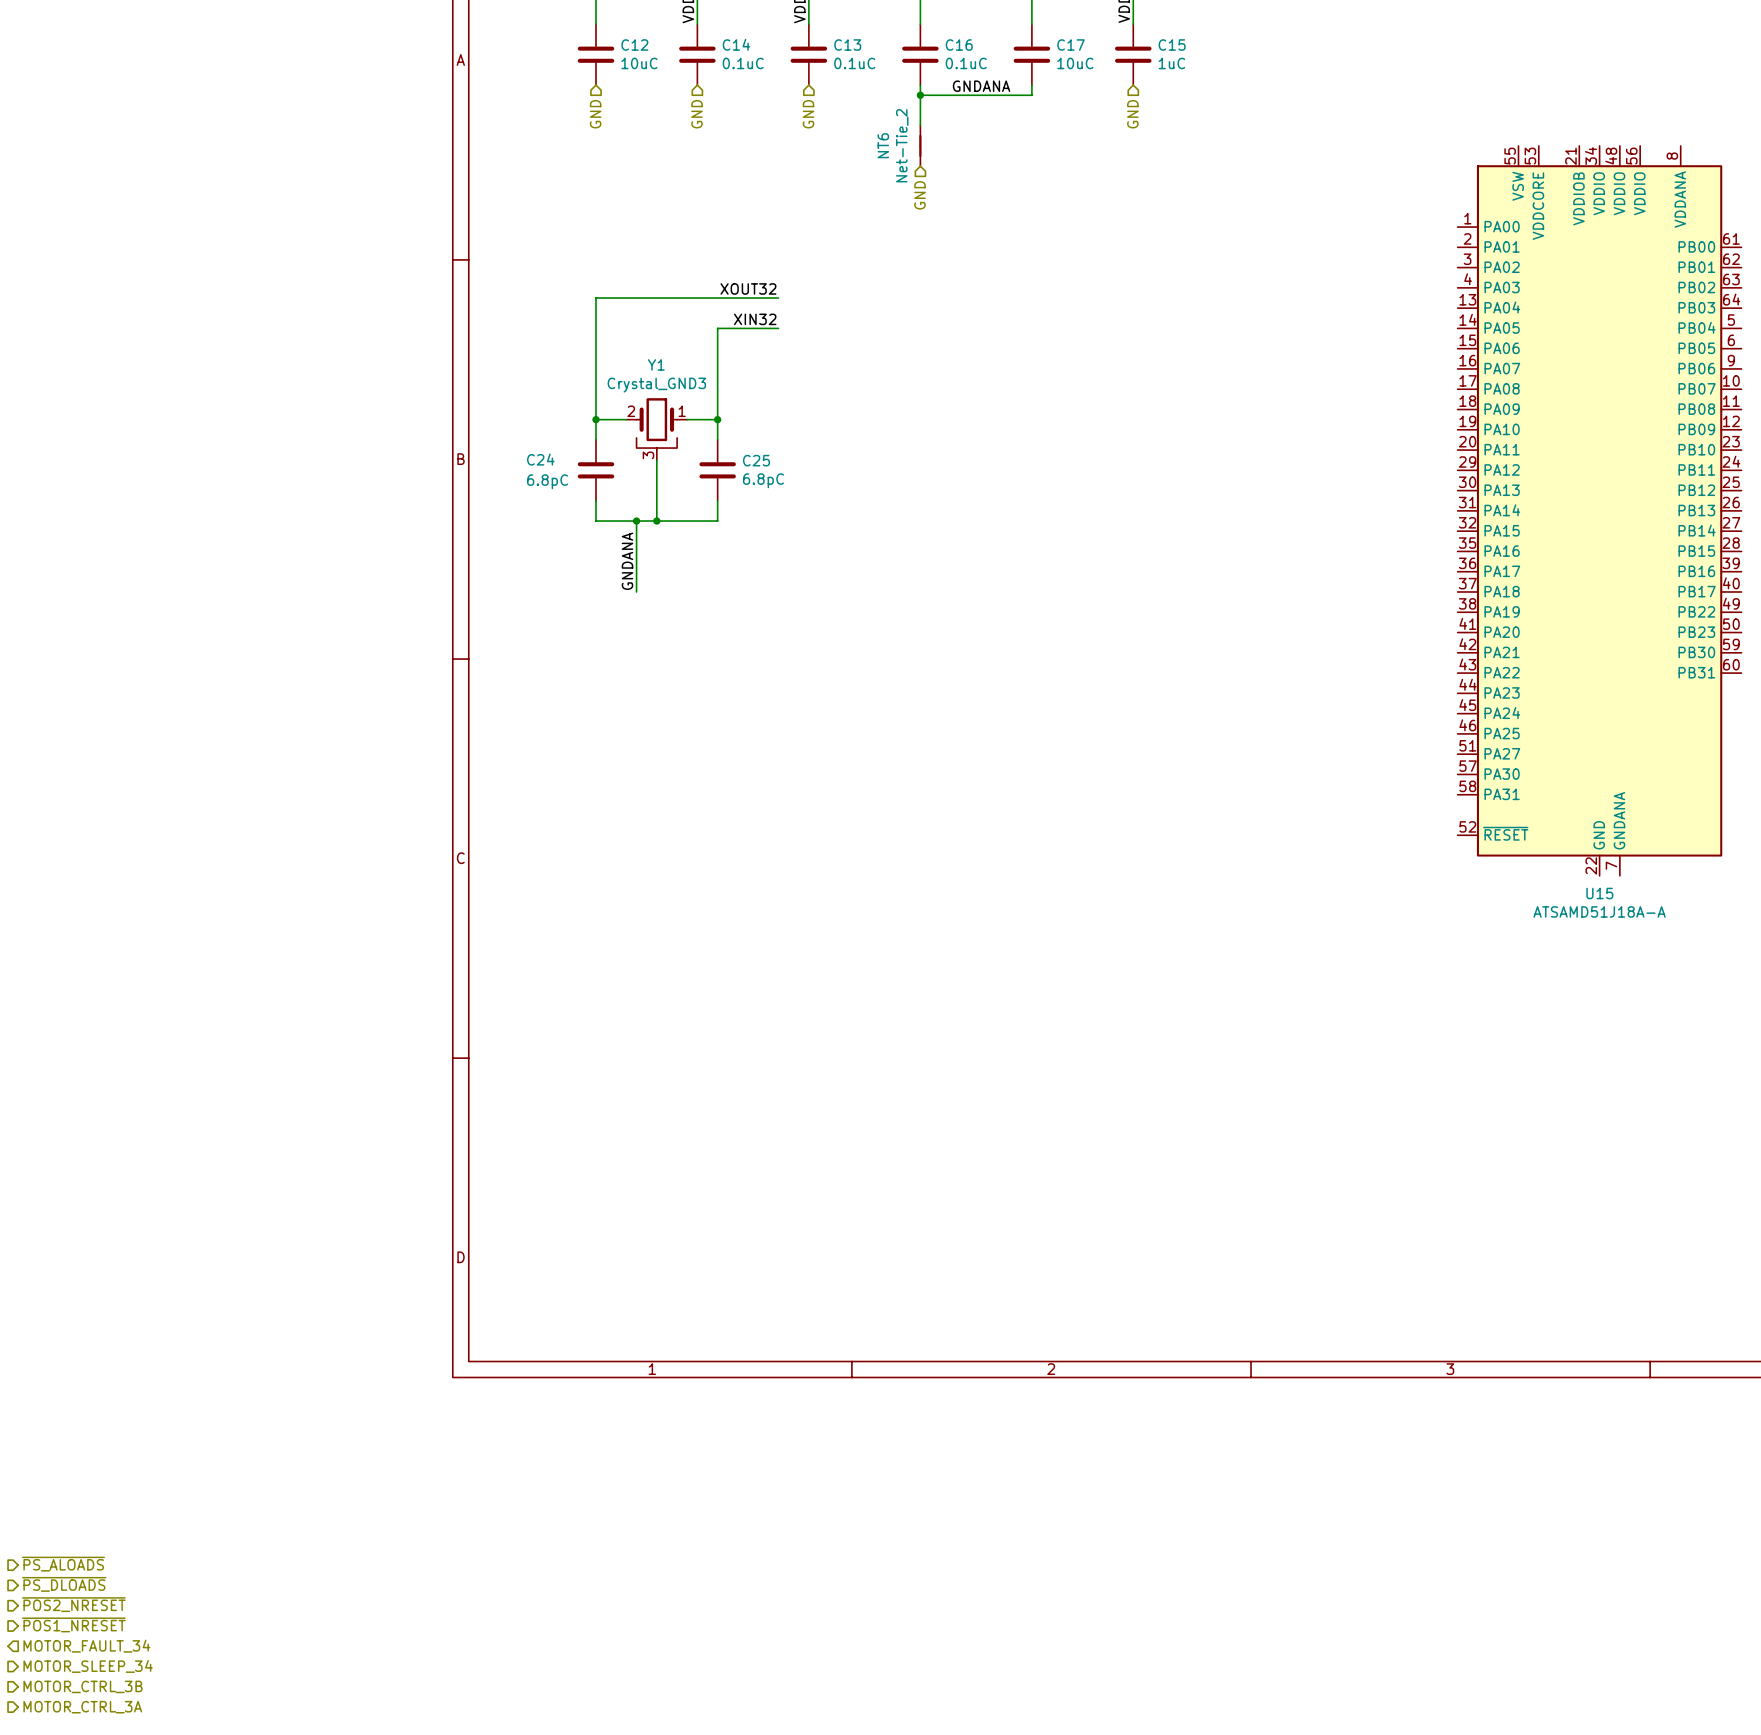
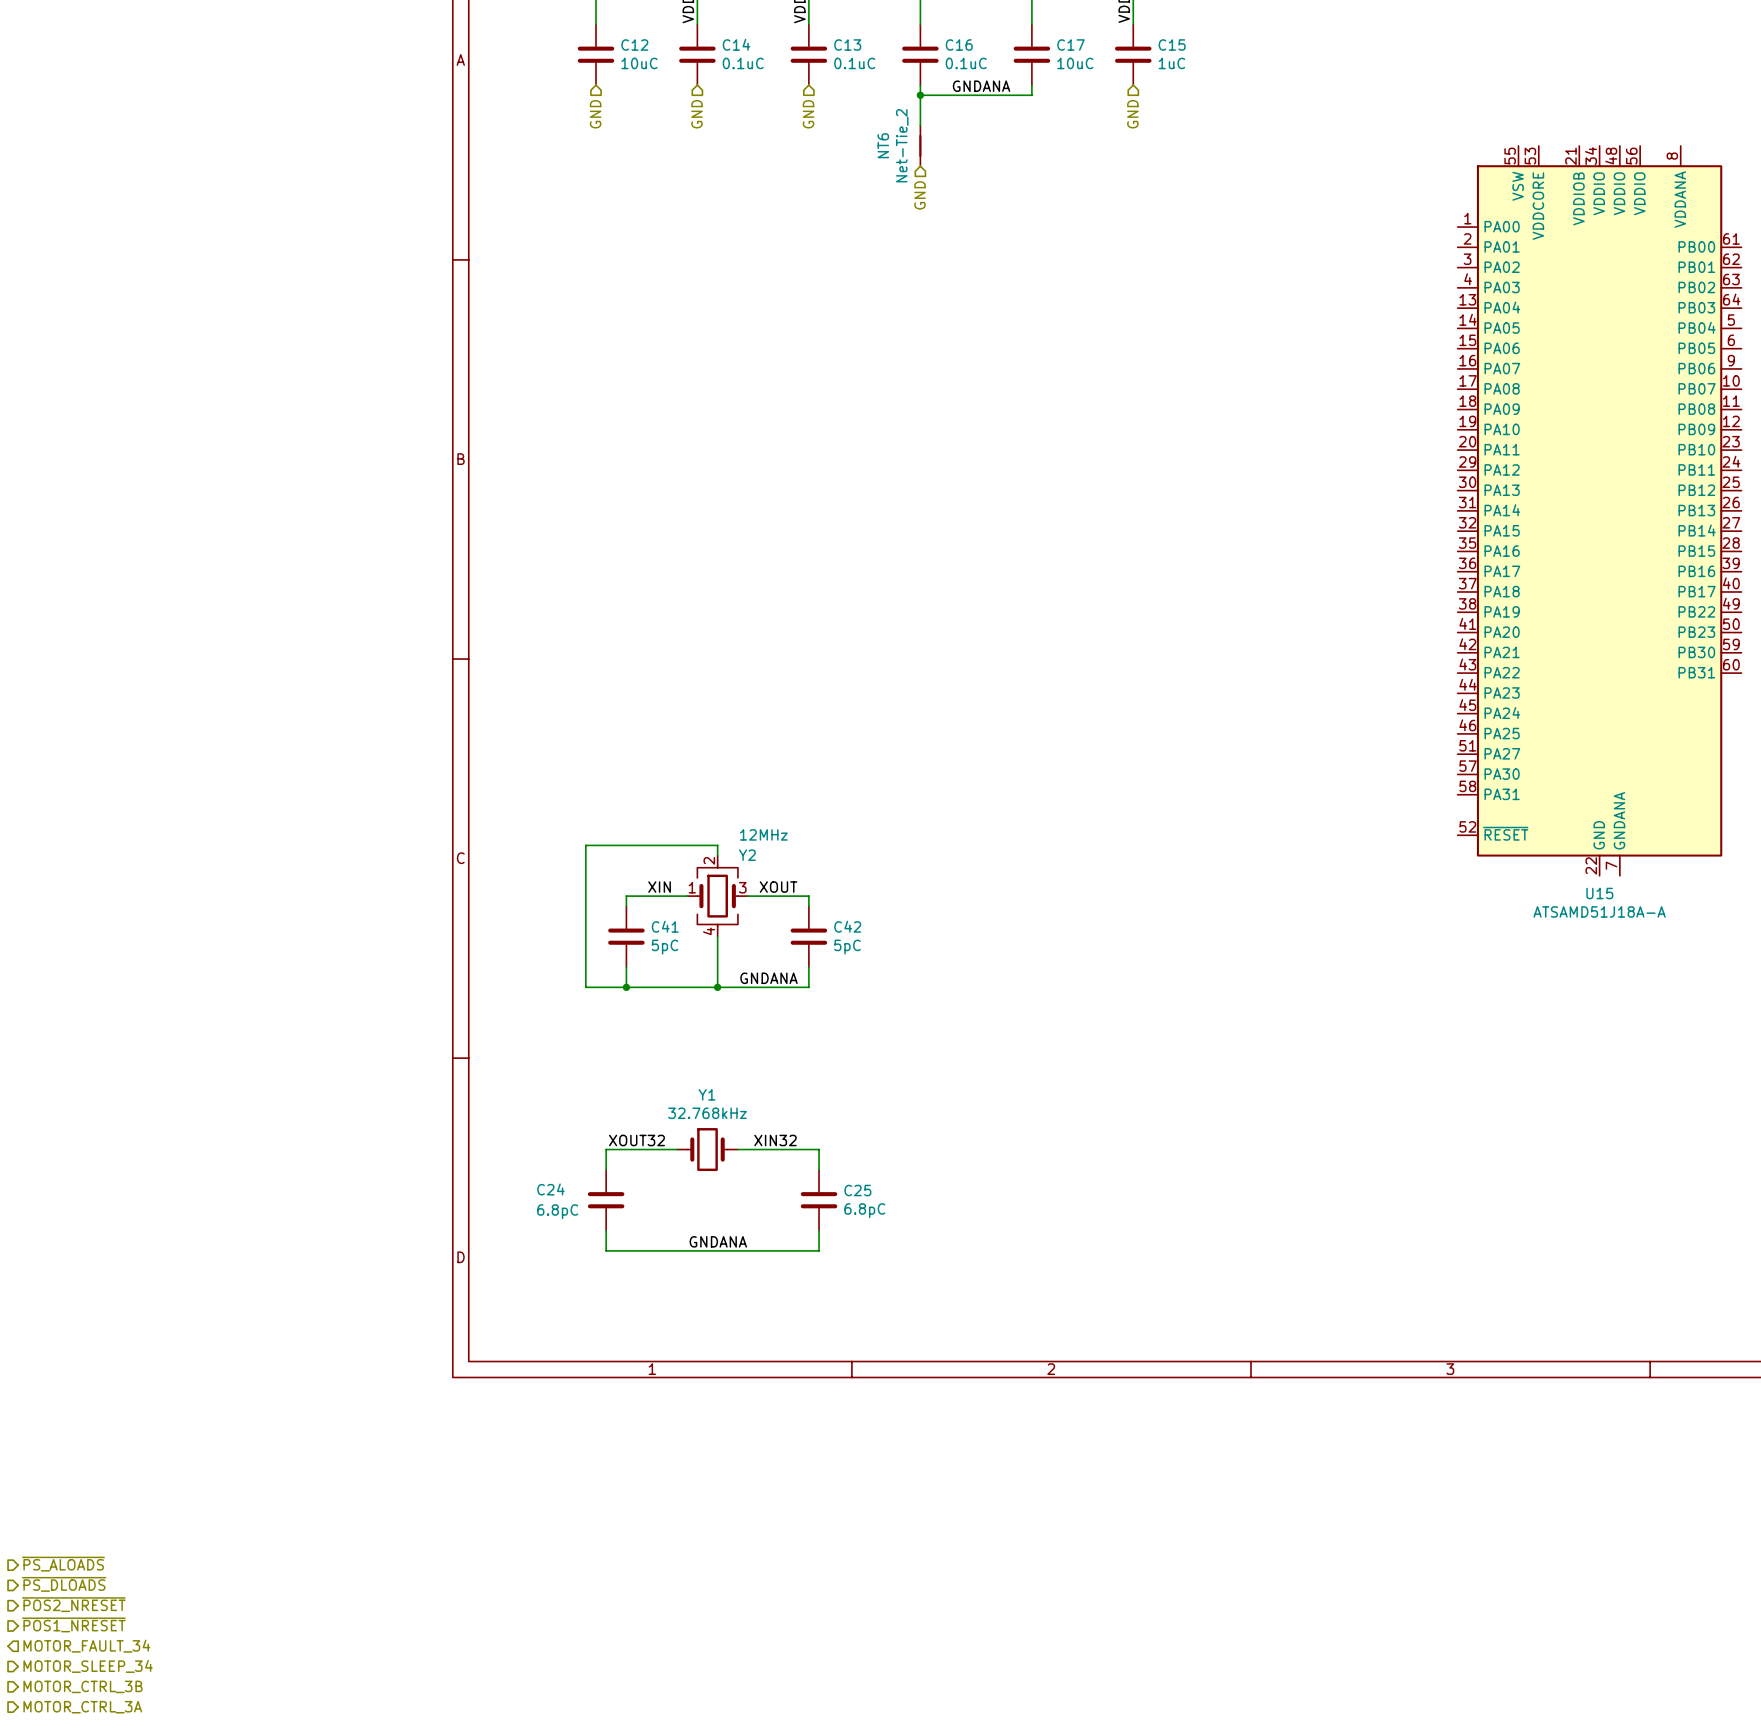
label: XOUT32 (748, 288) -> none
wire: (778, 298) (596, 298) (596, 439) -> none
label: XIN32 (755, 319) -> none
wire: (778, 328) (717, 328) (717, 439) -> none
Y1 value: Crystal_GND3 (656, 385) -> 32.768kHz (707, 1113)
Y1 symbol: [626, 398, 688, 461] -> [677, 1128, 738, 1172]
wire: (596, 419) (626, 419) -> none
junction: (596, 419) -> none
wire: (687, 419) (717, 419) -> none
junction: (717, 419) -> none
wire: (656, 460) (656, 521) -> none
C24 position: (596, 470) -> (606, 1200)
C25 position: (717, 470) -> (819, 1200)
wire: (596, 500) (596, 521) (717, 521) (717, 500) -> none
wire: (636, 521) (636, 591) -> none
junction: (636, 521) -> none
junction: (656, 521) -> none
label: GNDANA (627, 561) -> none
wire: none -> (717, 855) (717, 845) (585, 845) (585, 987) (808, 987) (808, 967)
label: none -> XIN (659, 887)
label: none -> XOUT (778, 887)
wire: none -> (687, 896) (626, 896) (626, 906)
Y2: none -> 12MHz (717, 896)
wire: none -> (748, 896) (808, 896) (808, 906)
C41: none -> 5pC (626, 936)
wire: none -> (717, 936) (717, 987)
C42: none -> 5pC (808, 936)
wire: none -> (626, 967) (626, 987)
label: none -> GNDANA (768, 978)
junction: none -> (626, 987)
junction: none -> (717, 987)
label: none -> XOUT32 (636, 1140)
label: none -> XIN32 (775, 1140)
wire: none -> (677, 1149) (606, 1149) (606, 1169)
wire: none -> (737, 1149) (819, 1149) (819, 1169)
wire: none -> (606, 1230) (606, 1250) (819, 1250) (819, 1230)
label: none -> GNDANA (718, 1241)

